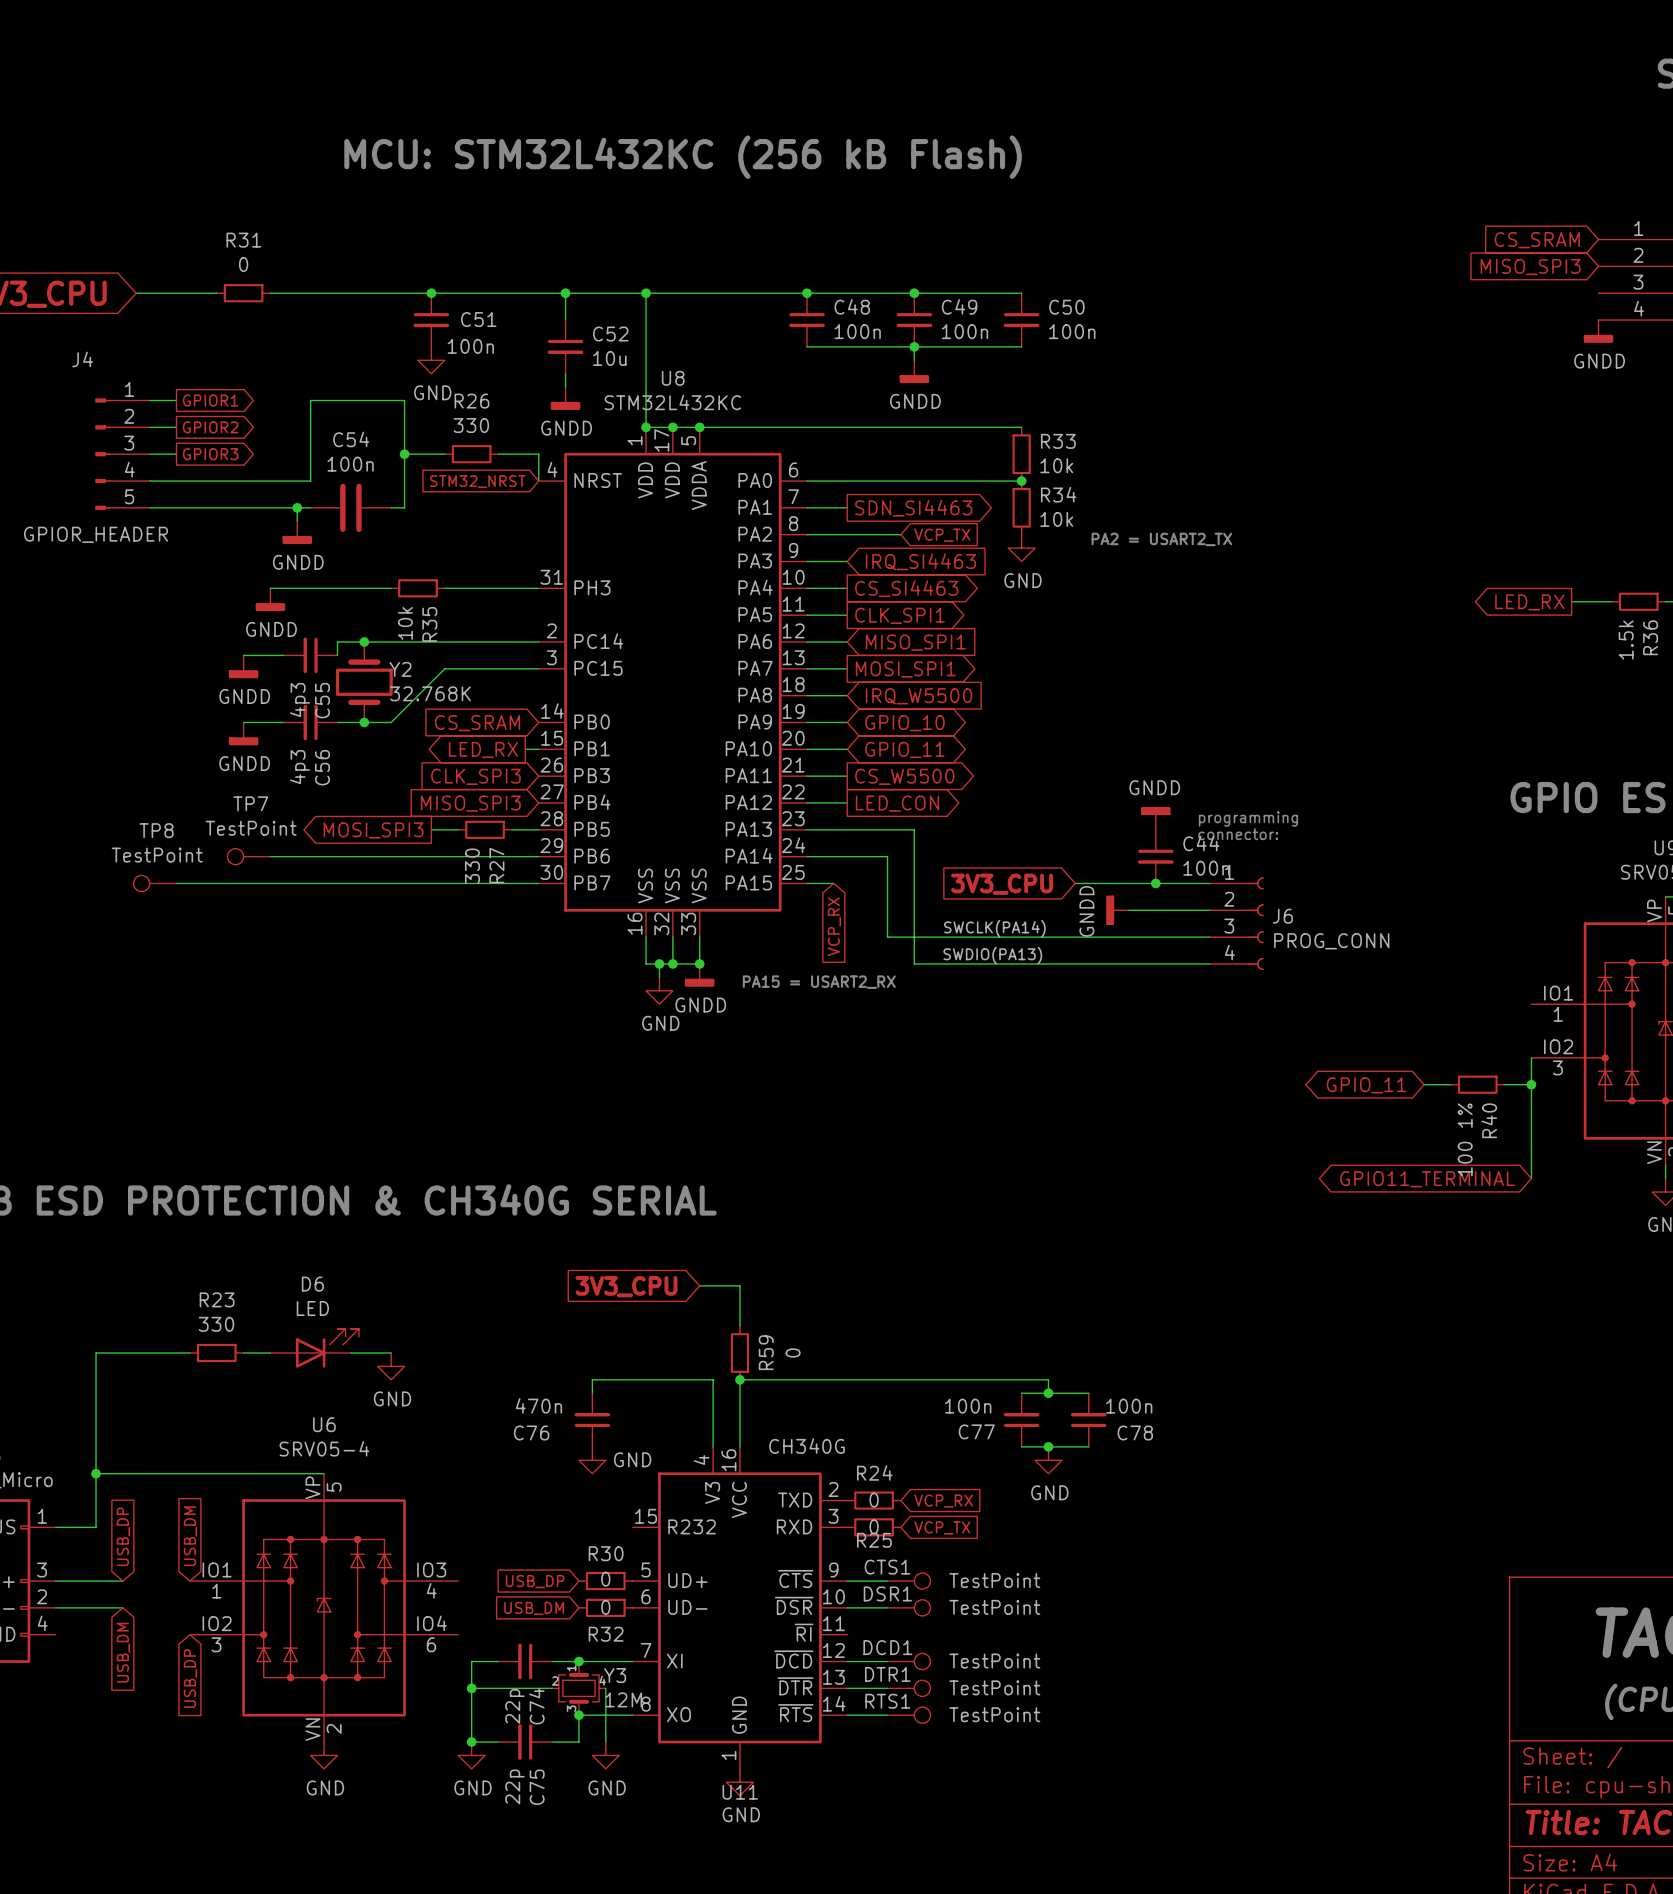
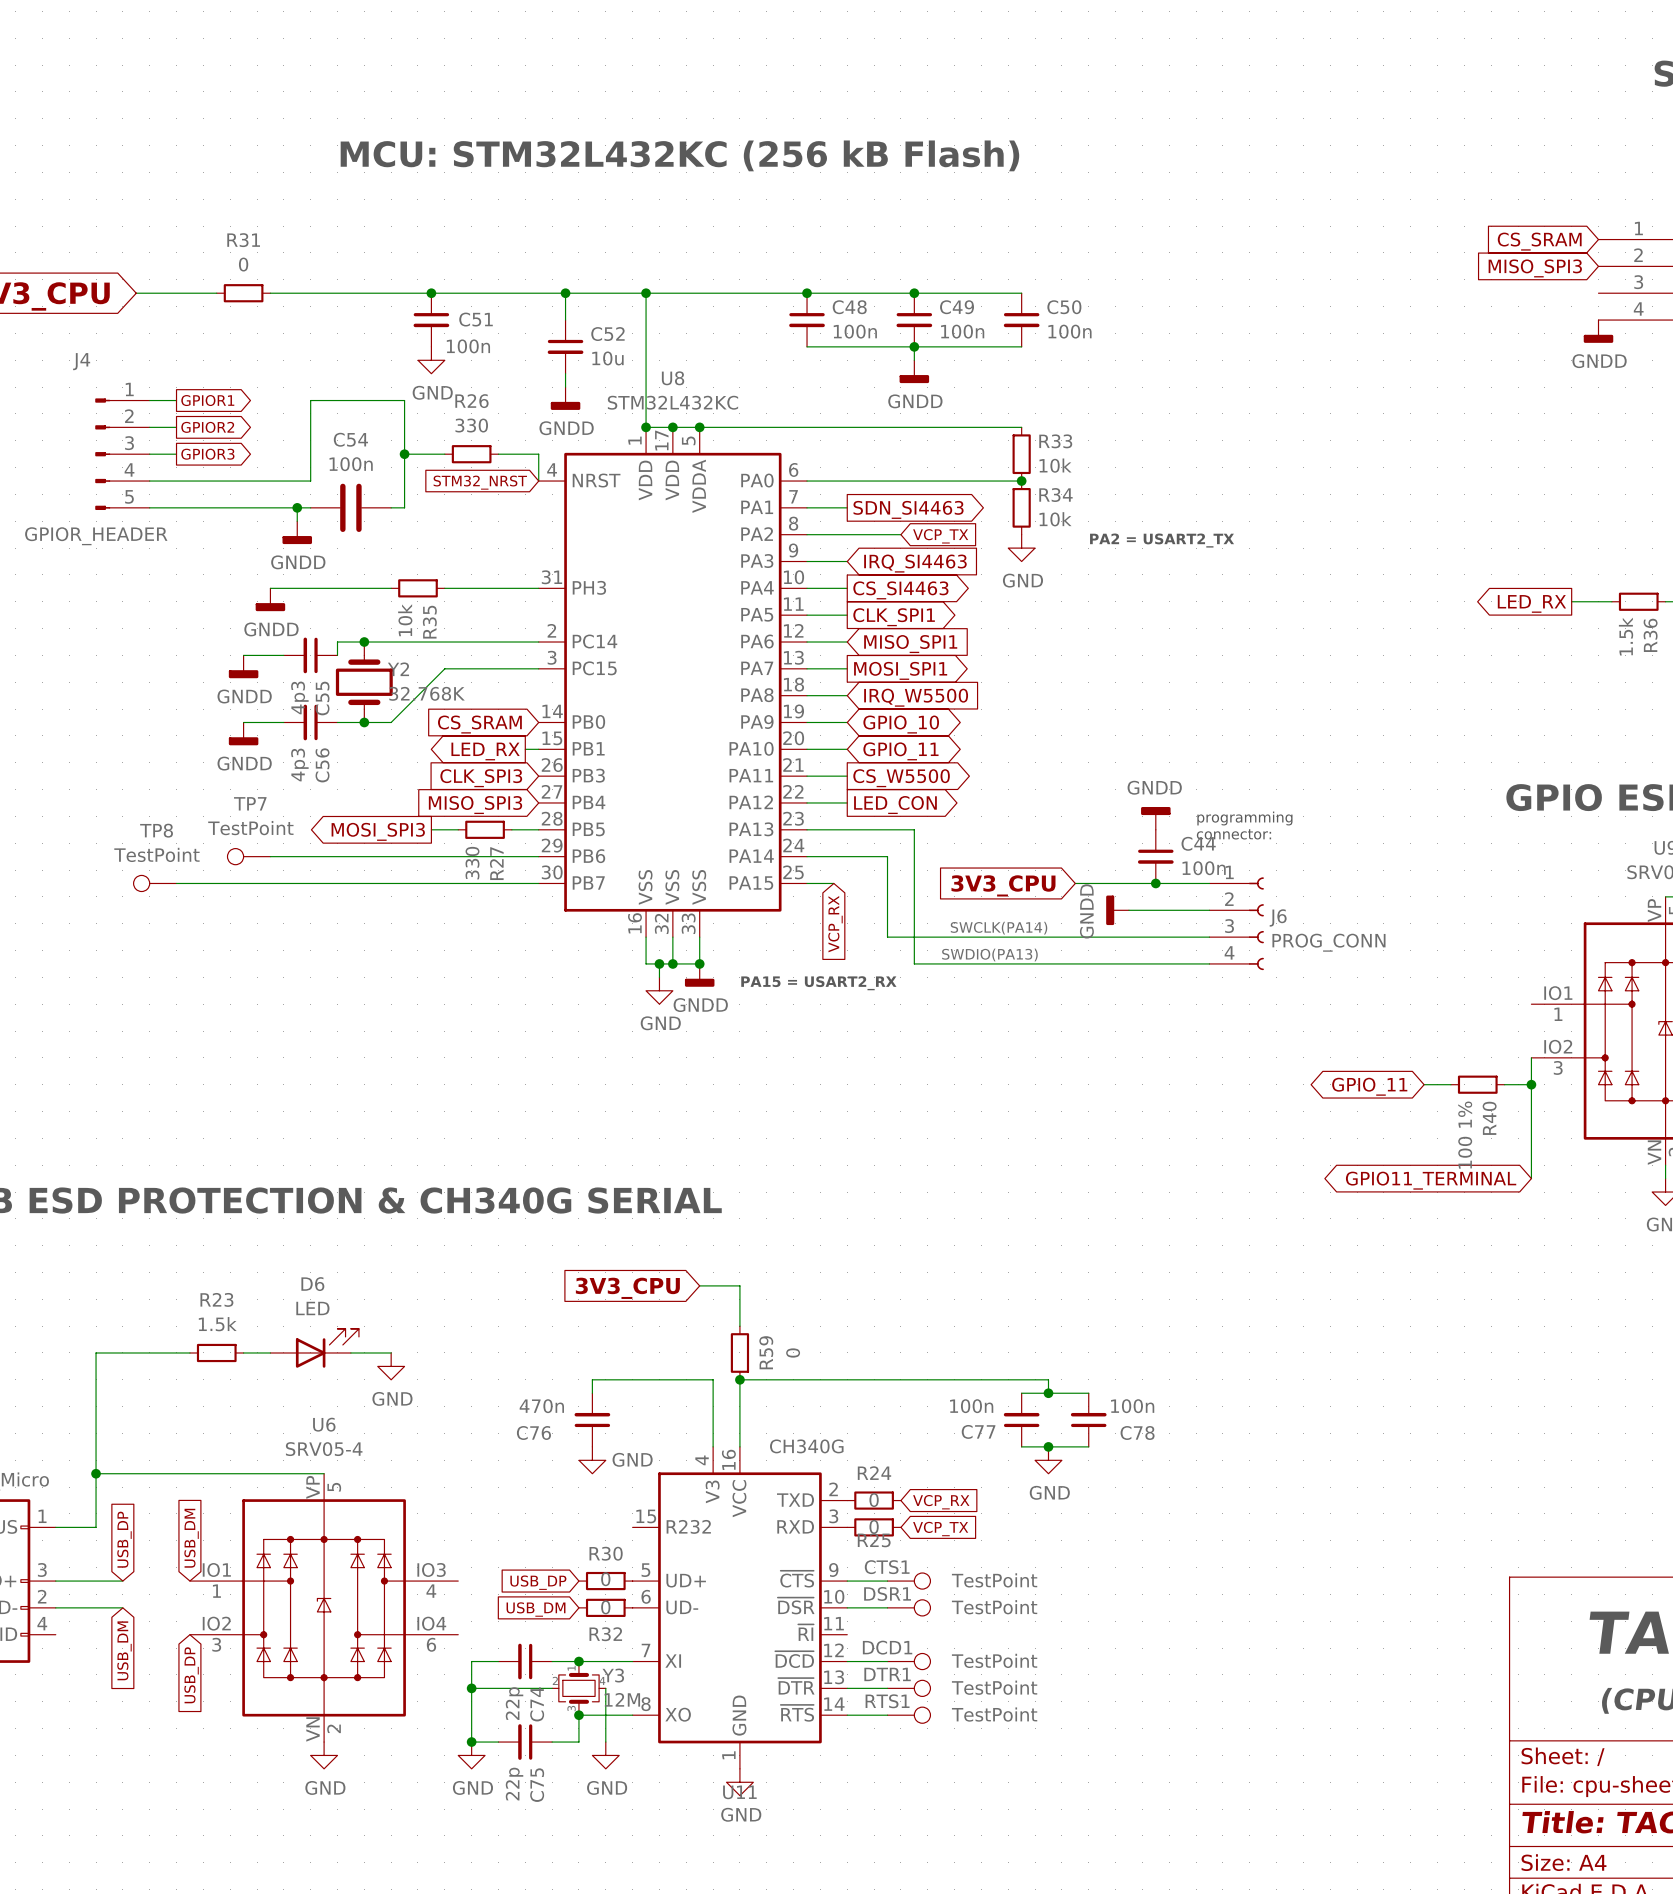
R23 value: 330 (216, 1324) -> 1.5k (217, 1324)

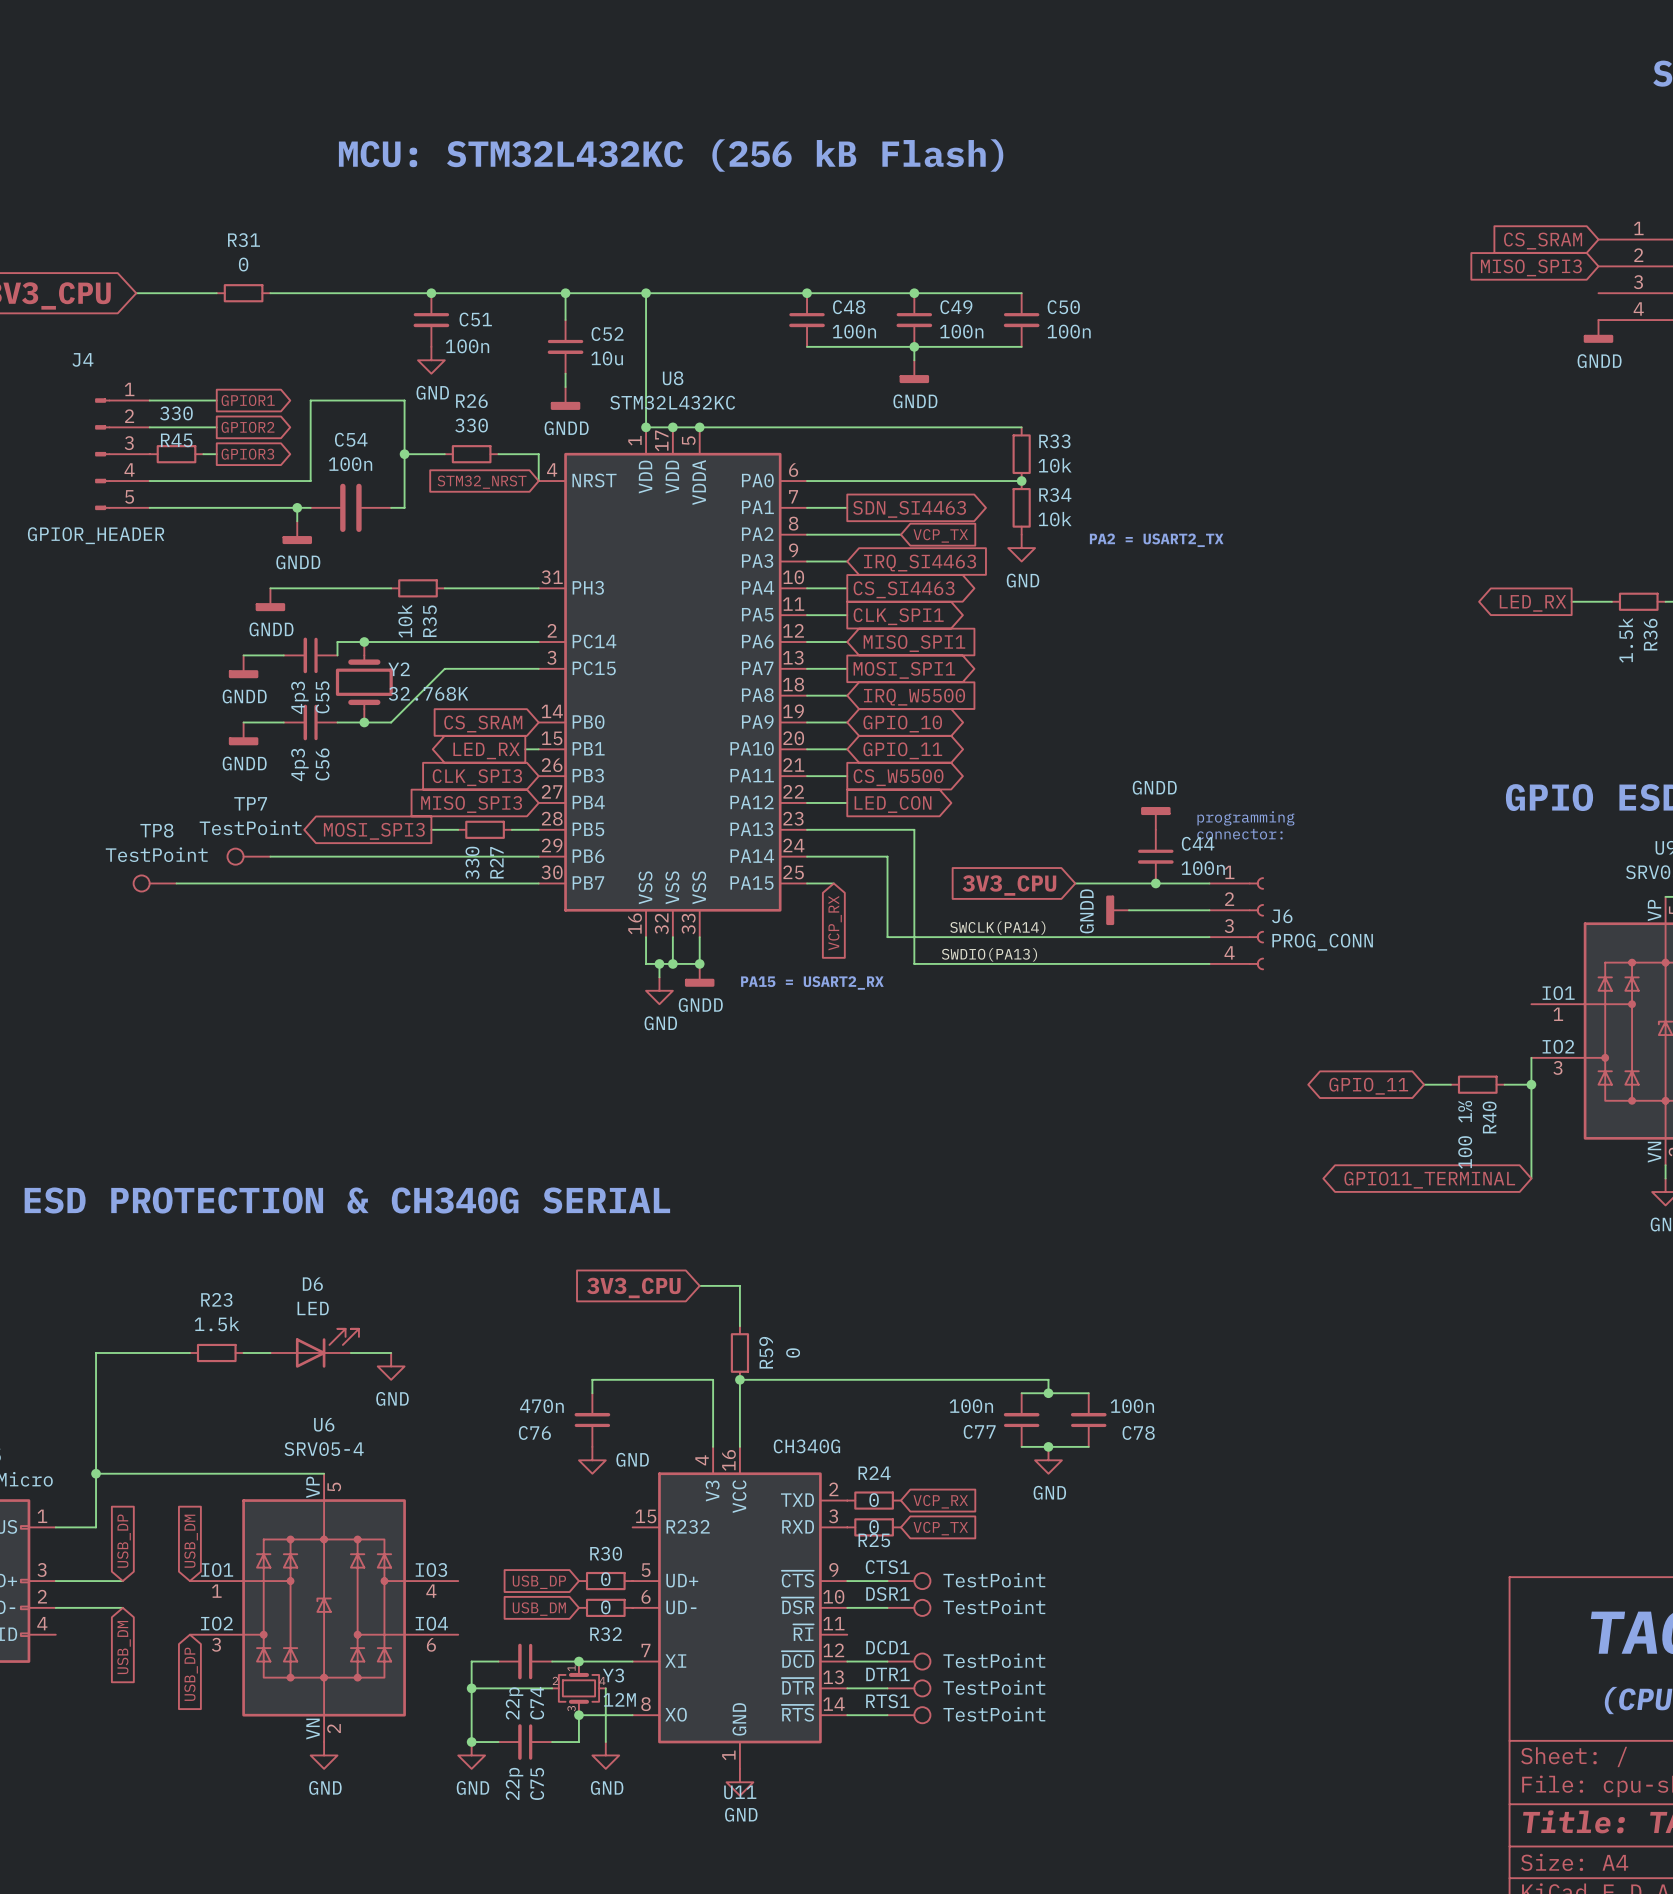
wire: none -> (176, 400) (216, 400)
global label position: GPIOR1 (207, 400) -> GPIOR1 (248, 400)
wire: none -> (176, 427) (216, 427)
global label position: GPIOR2 (207, 427) -> GPIOR2 (248, 427)
wire: (149, 454) (176, 454) -> none
R45: none -> 330 (176, 454)
wire: none -> (203, 454) (216, 454)
global label position: GPIOR3 (207, 454) -> GPIOR3 (247, 454)

